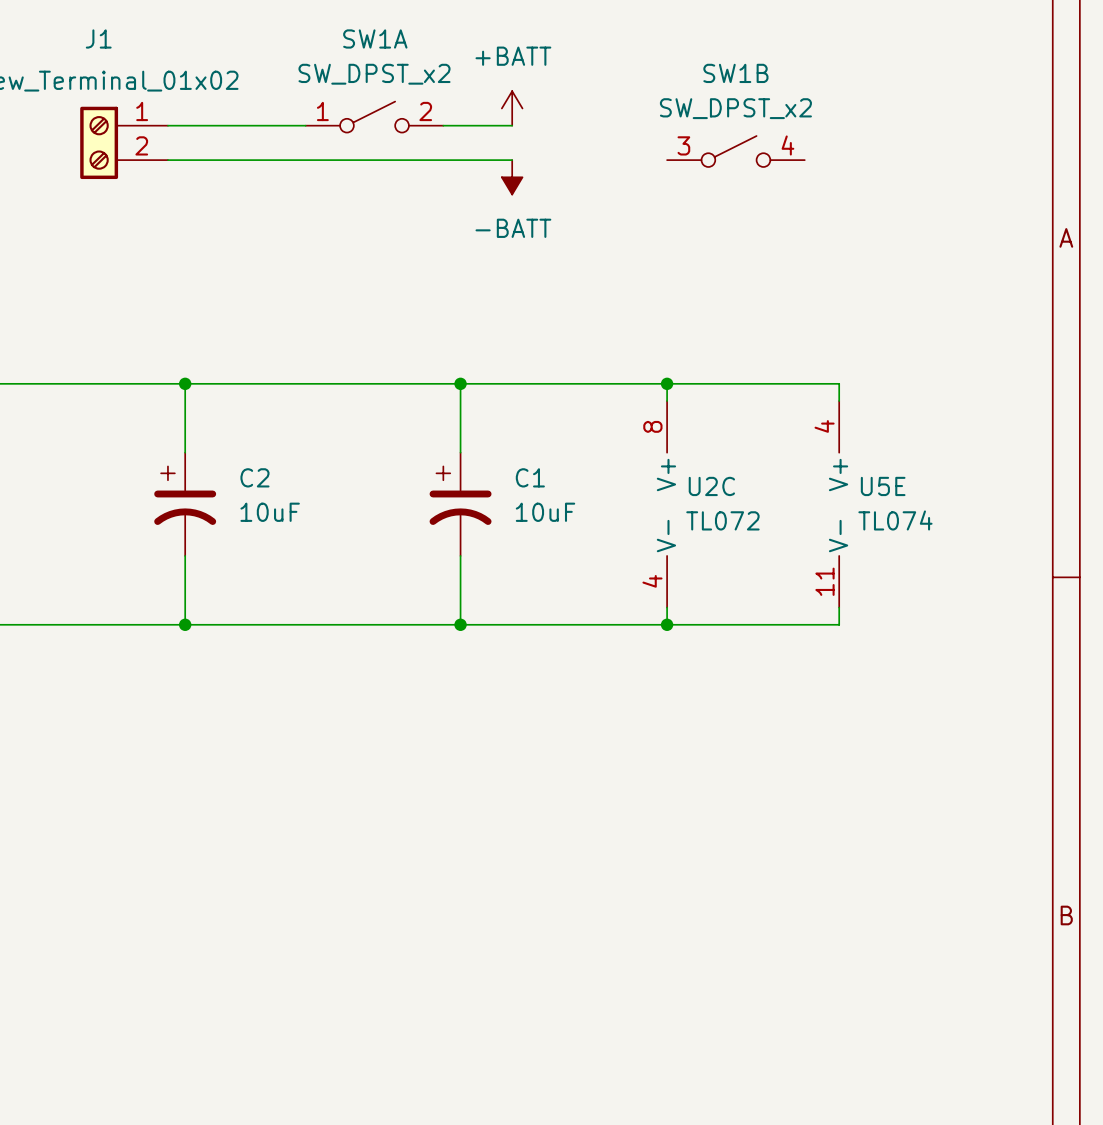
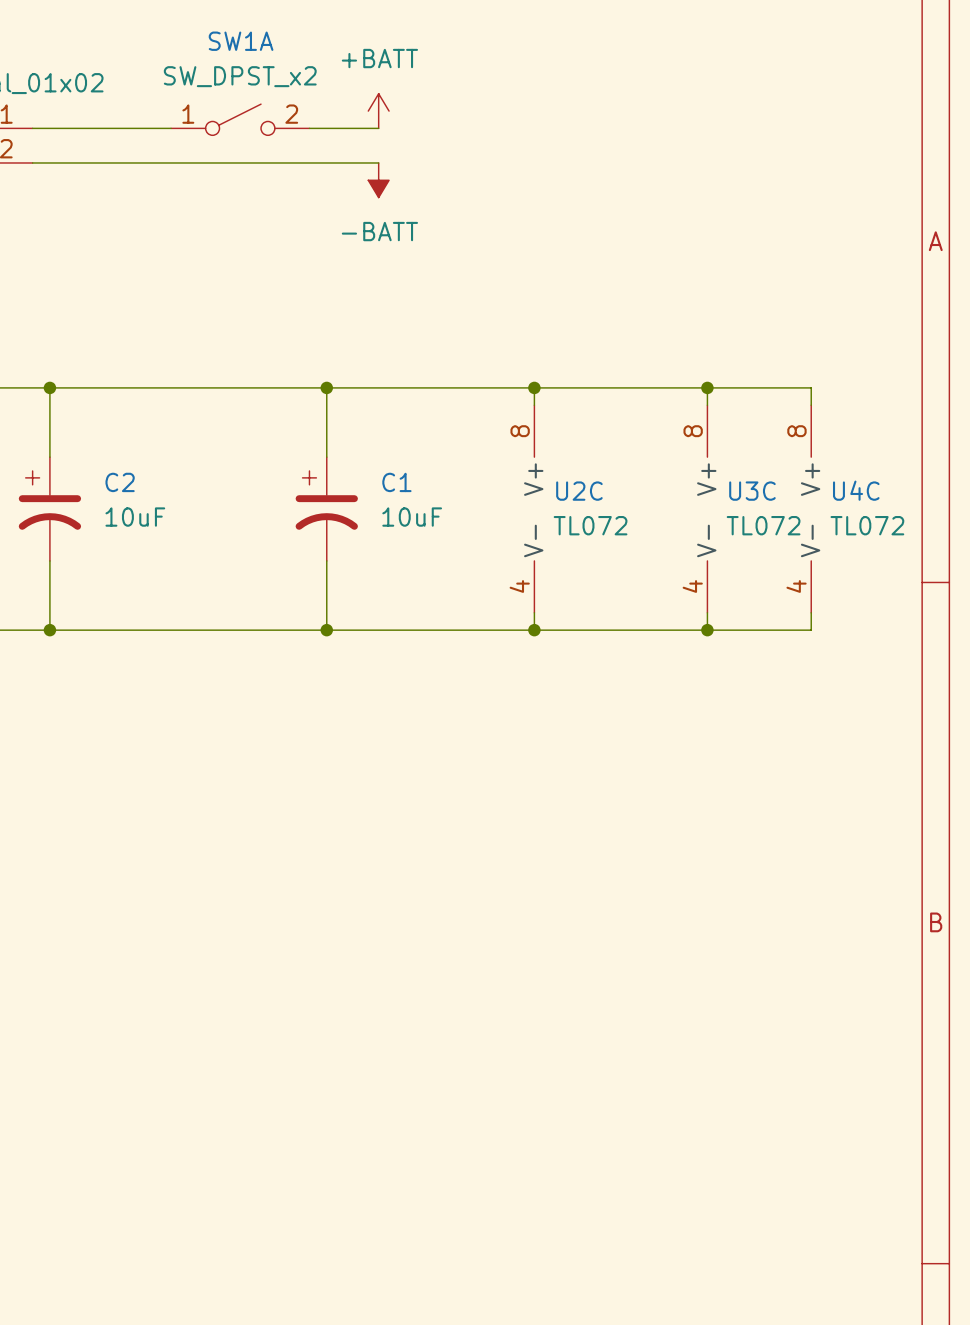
SW1B: SW_DPST_x2 (735, 151) -> none
wire: none -> (707, 387) (811, 387) (811, 405)
junction: none -> (707, 387)
U5E pin number: 4 (824, 426) -> 8 (693, 431)
U5E name: U5E (883, 486) -> U3C (752, 491)
U4C: none -> TL072 (811, 509)
U5E value: TL074 (895, 520) -> TL072 (763, 525)
U5E pin number: 11 (824, 581) -> 4 (692, 586)
wire: none -> (811, 612) (811, 630) (707, 630)
junction: none -> (707, 630)

